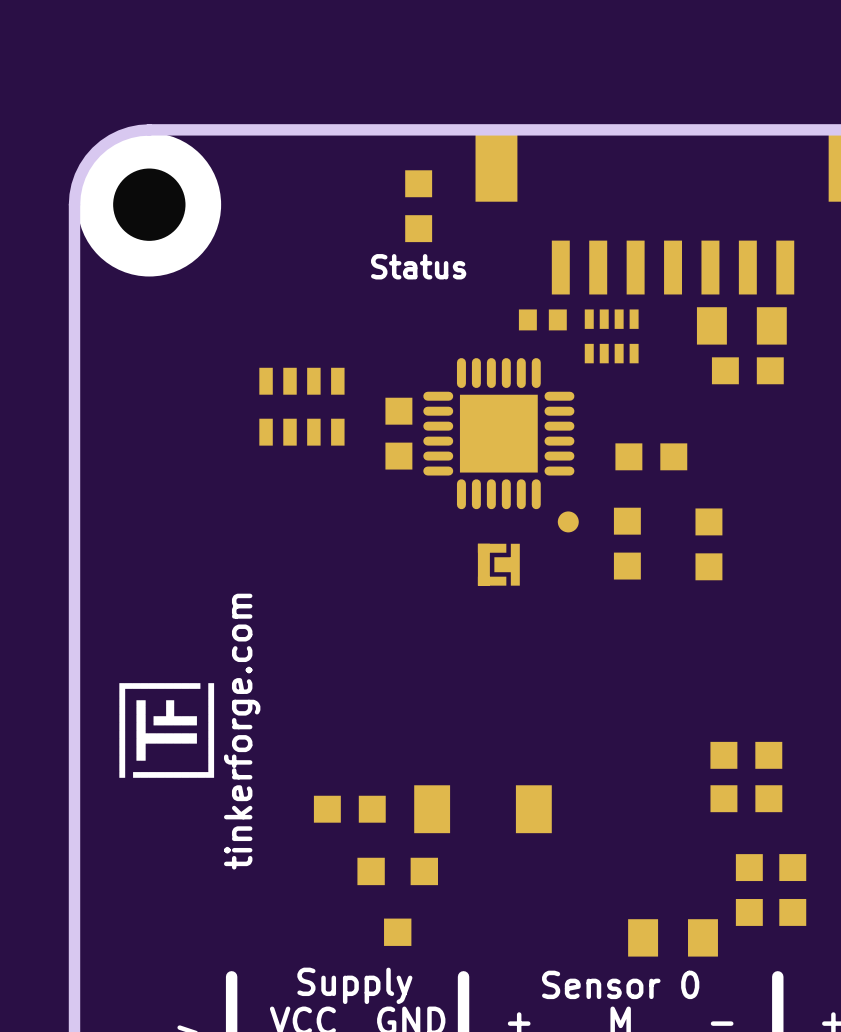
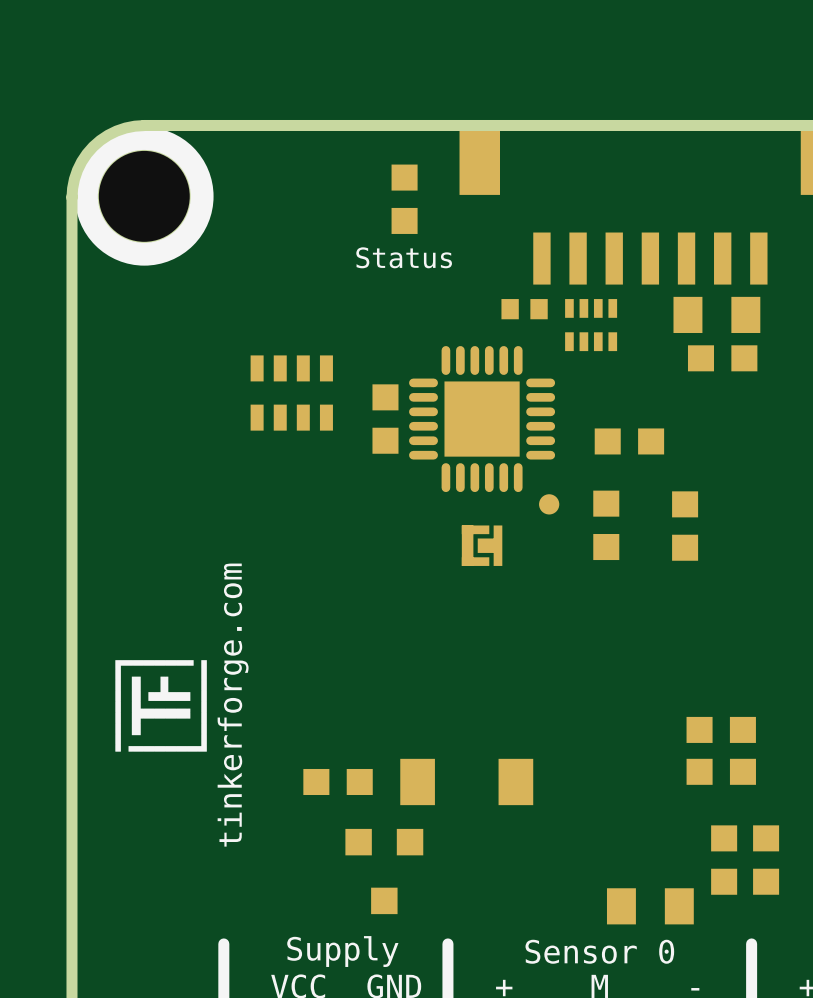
part footprint: [77, 132, 222, 277] -> [75, 127, 214, 266]

